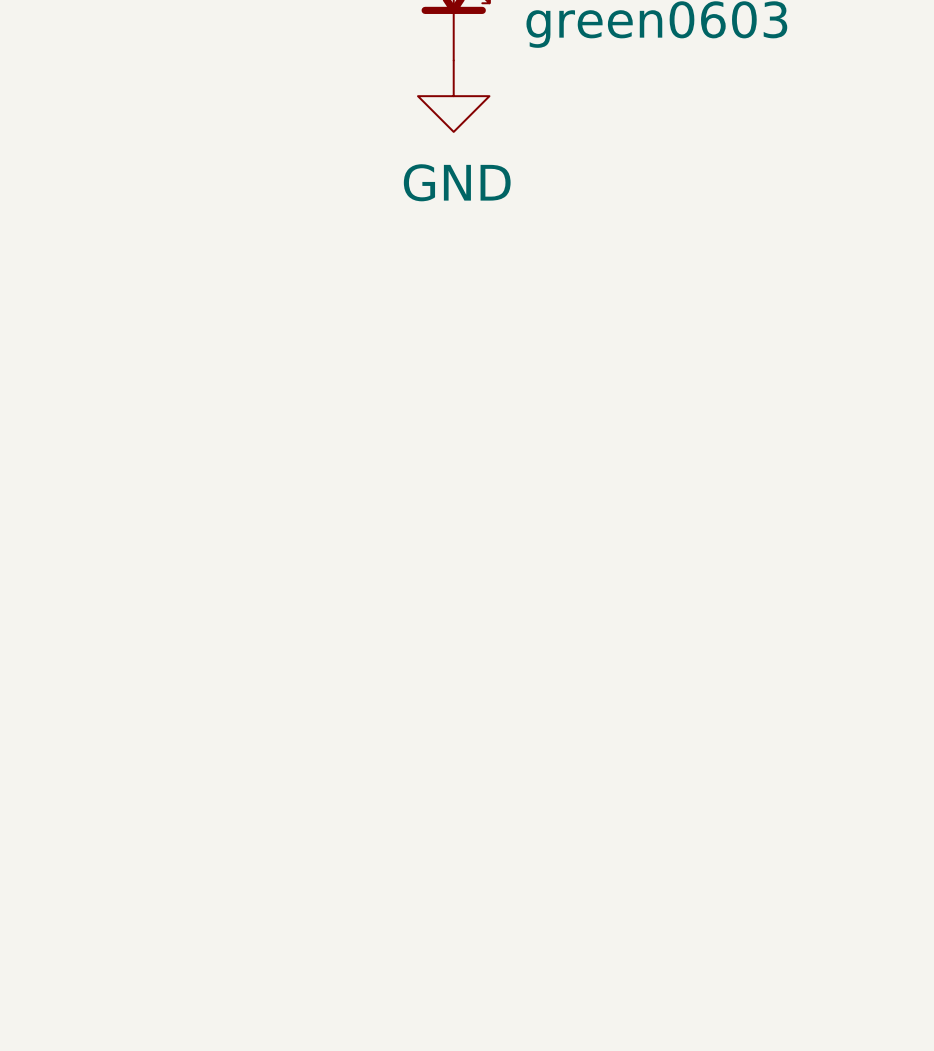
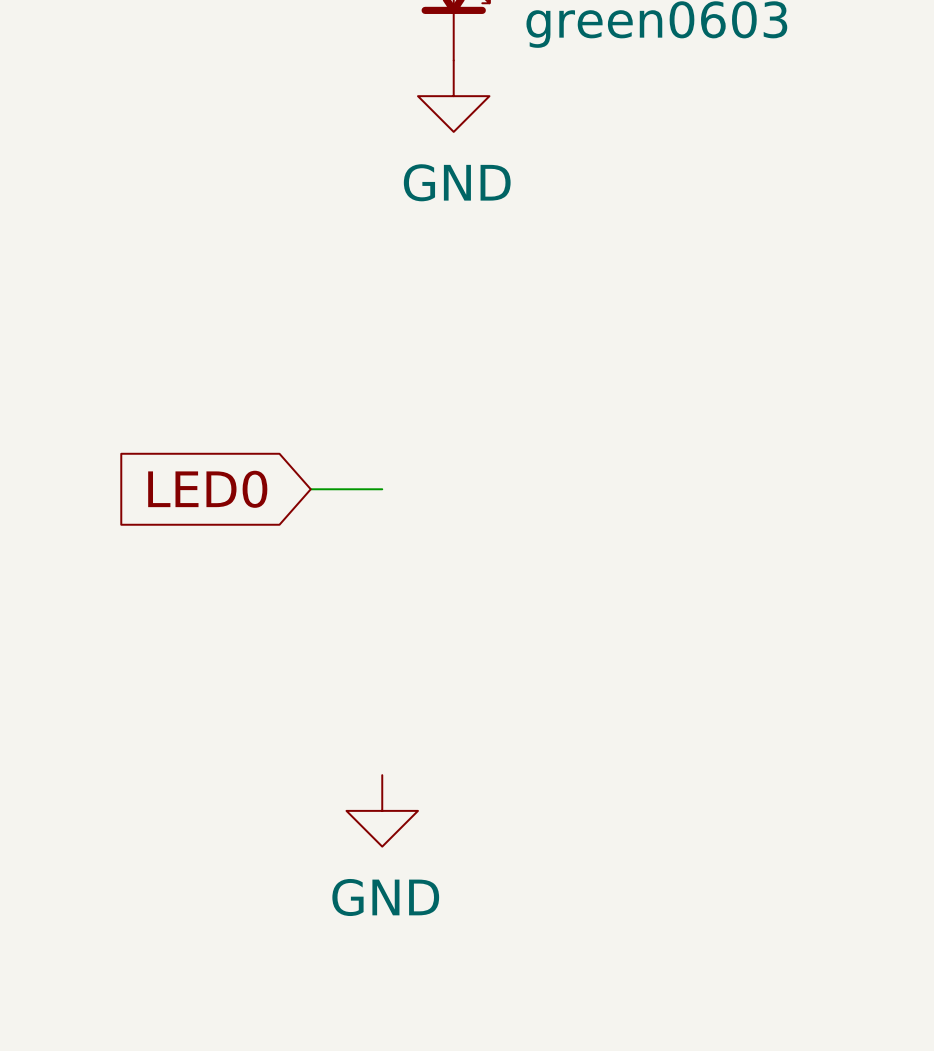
global label: none -> LED0 (207, 489)
wire: none -> (310, 489) (382, 489)
power symbol: none -> GND (382, 810)

